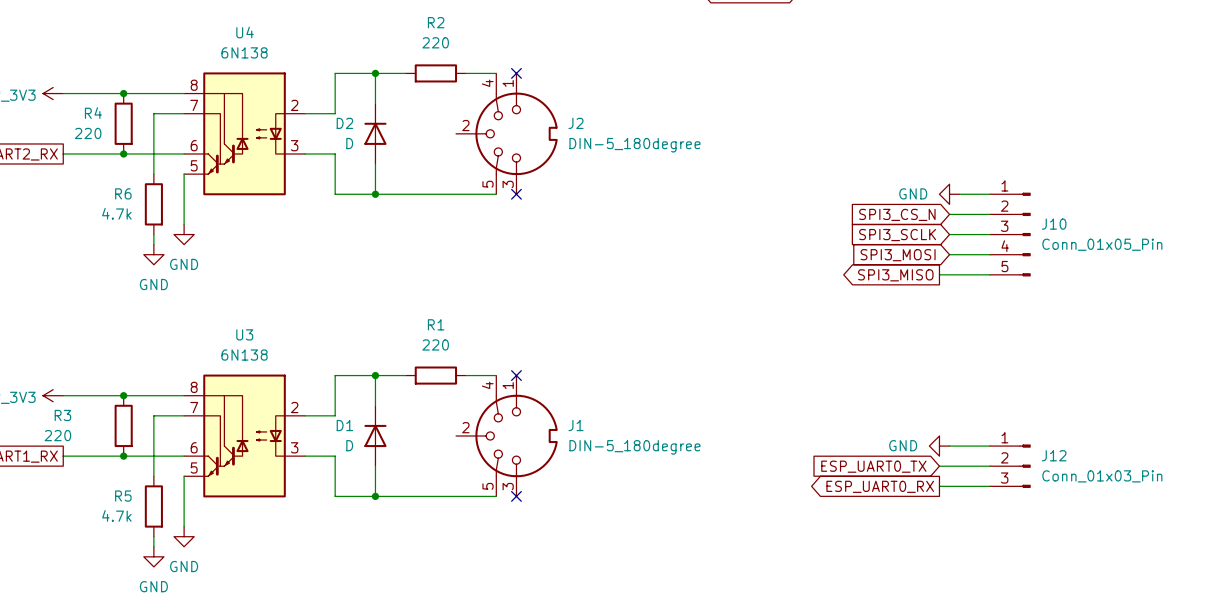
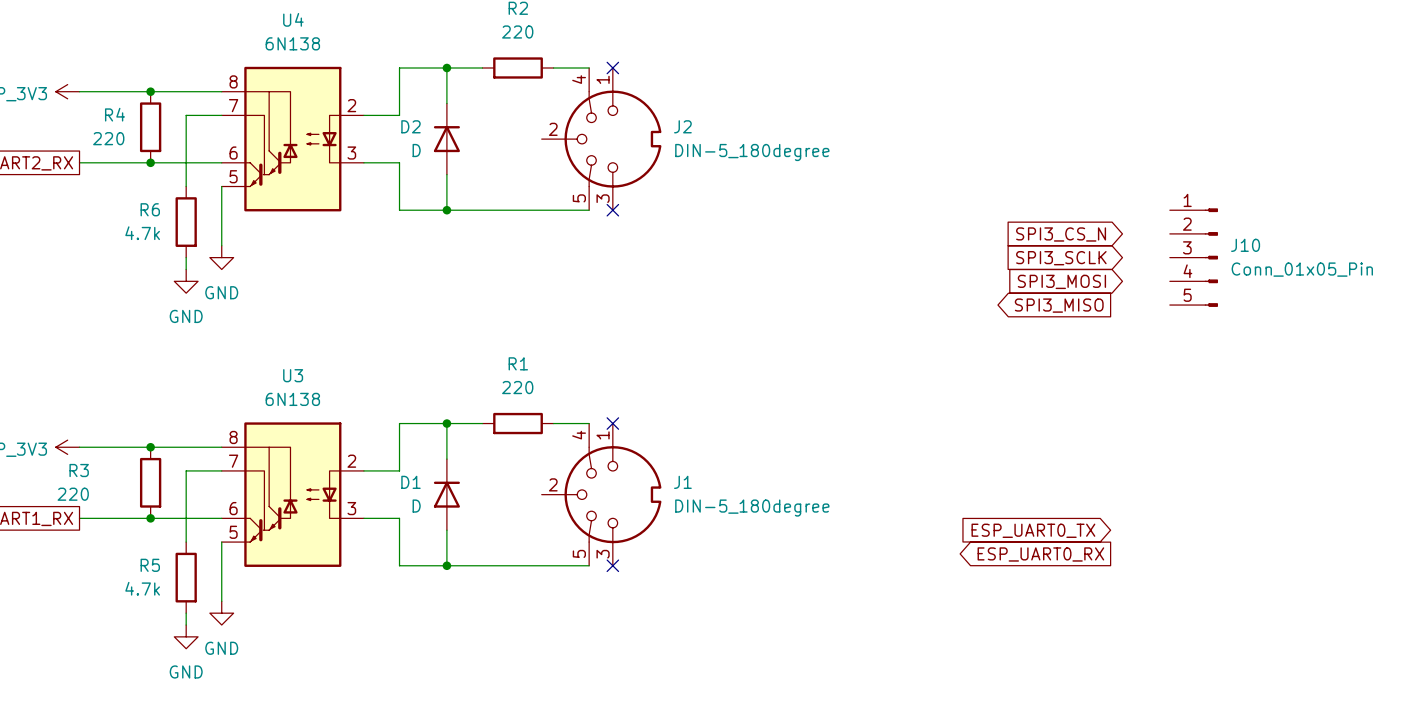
power symbol: GND (949, 194) -> none
wire: (959, 194) (989, 194) -> none
wire: (949, 214) (989, 214) -> none
wire: (949, 234) (989, 234) -> none
wire: (949, 254) (989, 254) -> none
wire: (939, 274) (989, 274) -> none
power symbol: GND (939, 446) -> none
wire: (949, 446) (989, 446) -> none
wire: (939, 466) (989, 466) -> none
J12: Conn_01x03_Pin (1010, 466) -> none
wire: (939, 486) (989, 486) -> none

